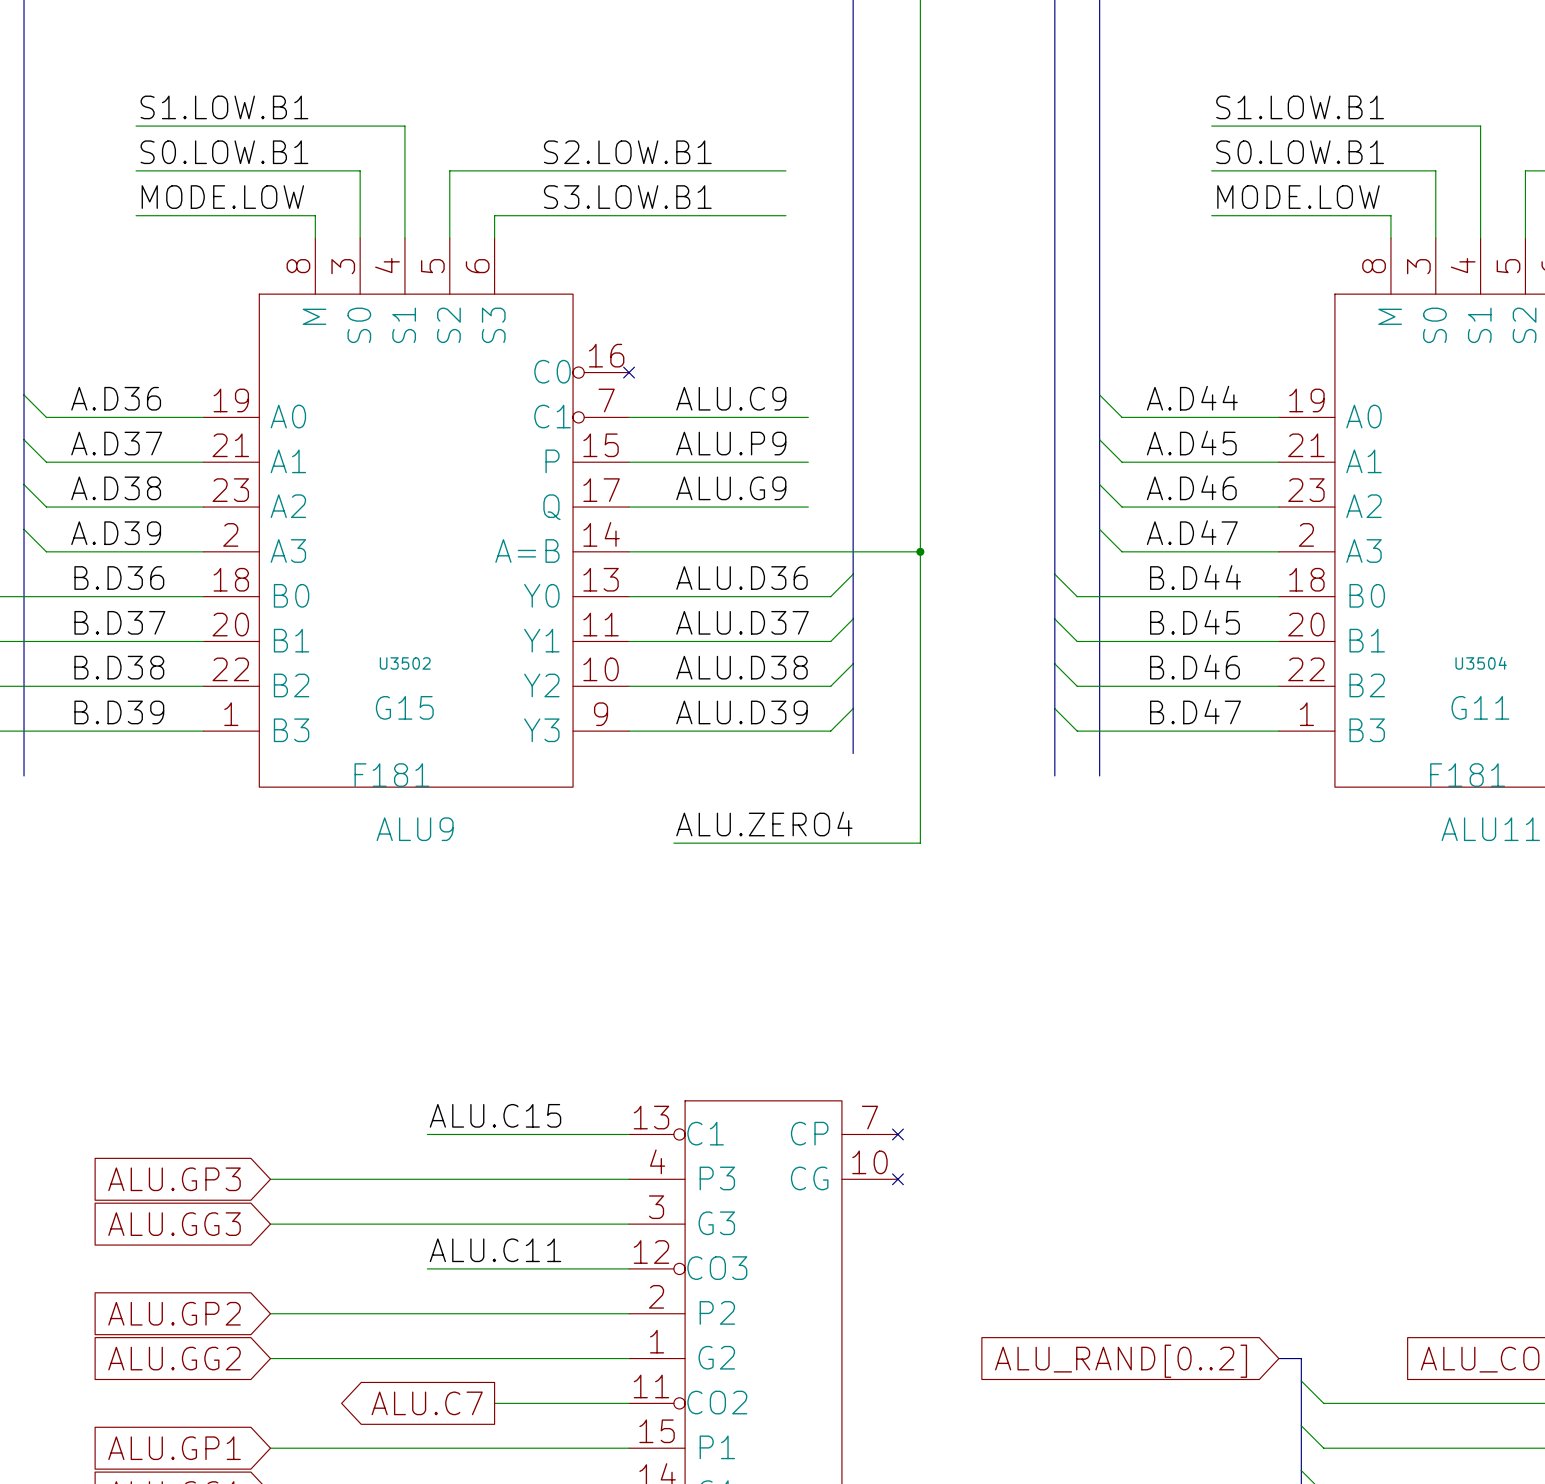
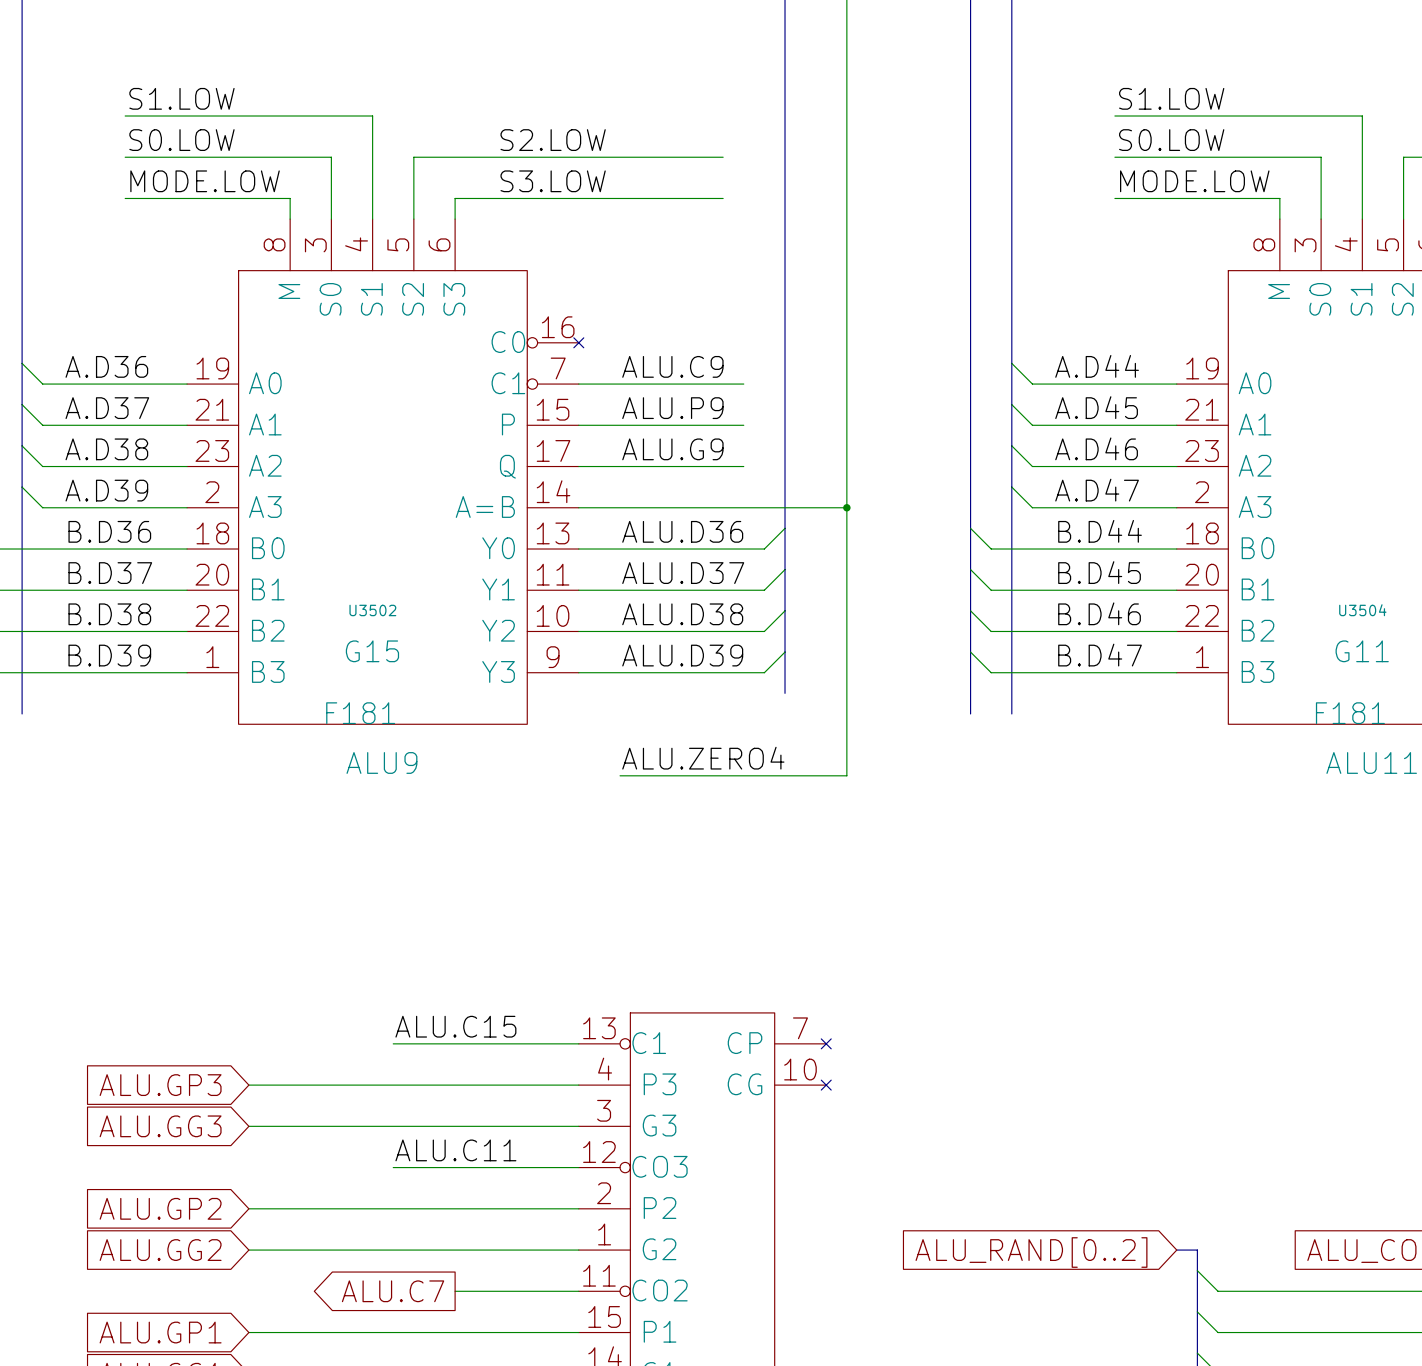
label: S1.LOW.B1 (224, 107) -> S1.LOW (181, 98)
label: S1.LOW.B1 (1300, 107) -> S1.LOW (1171, 98)
label: S0.LOW.B1 (224, 152) -> S0.LOW (181, 140)
label: S2.LOW.B1 (627, 152) -> S2.LOW (553, 140)
label: S0.LOW.B1 (1300, 152) -> S0.LOW (1171, 140)
label: S3.LOW.B1 (627, 197) -> S3.LOW (553, 181)

